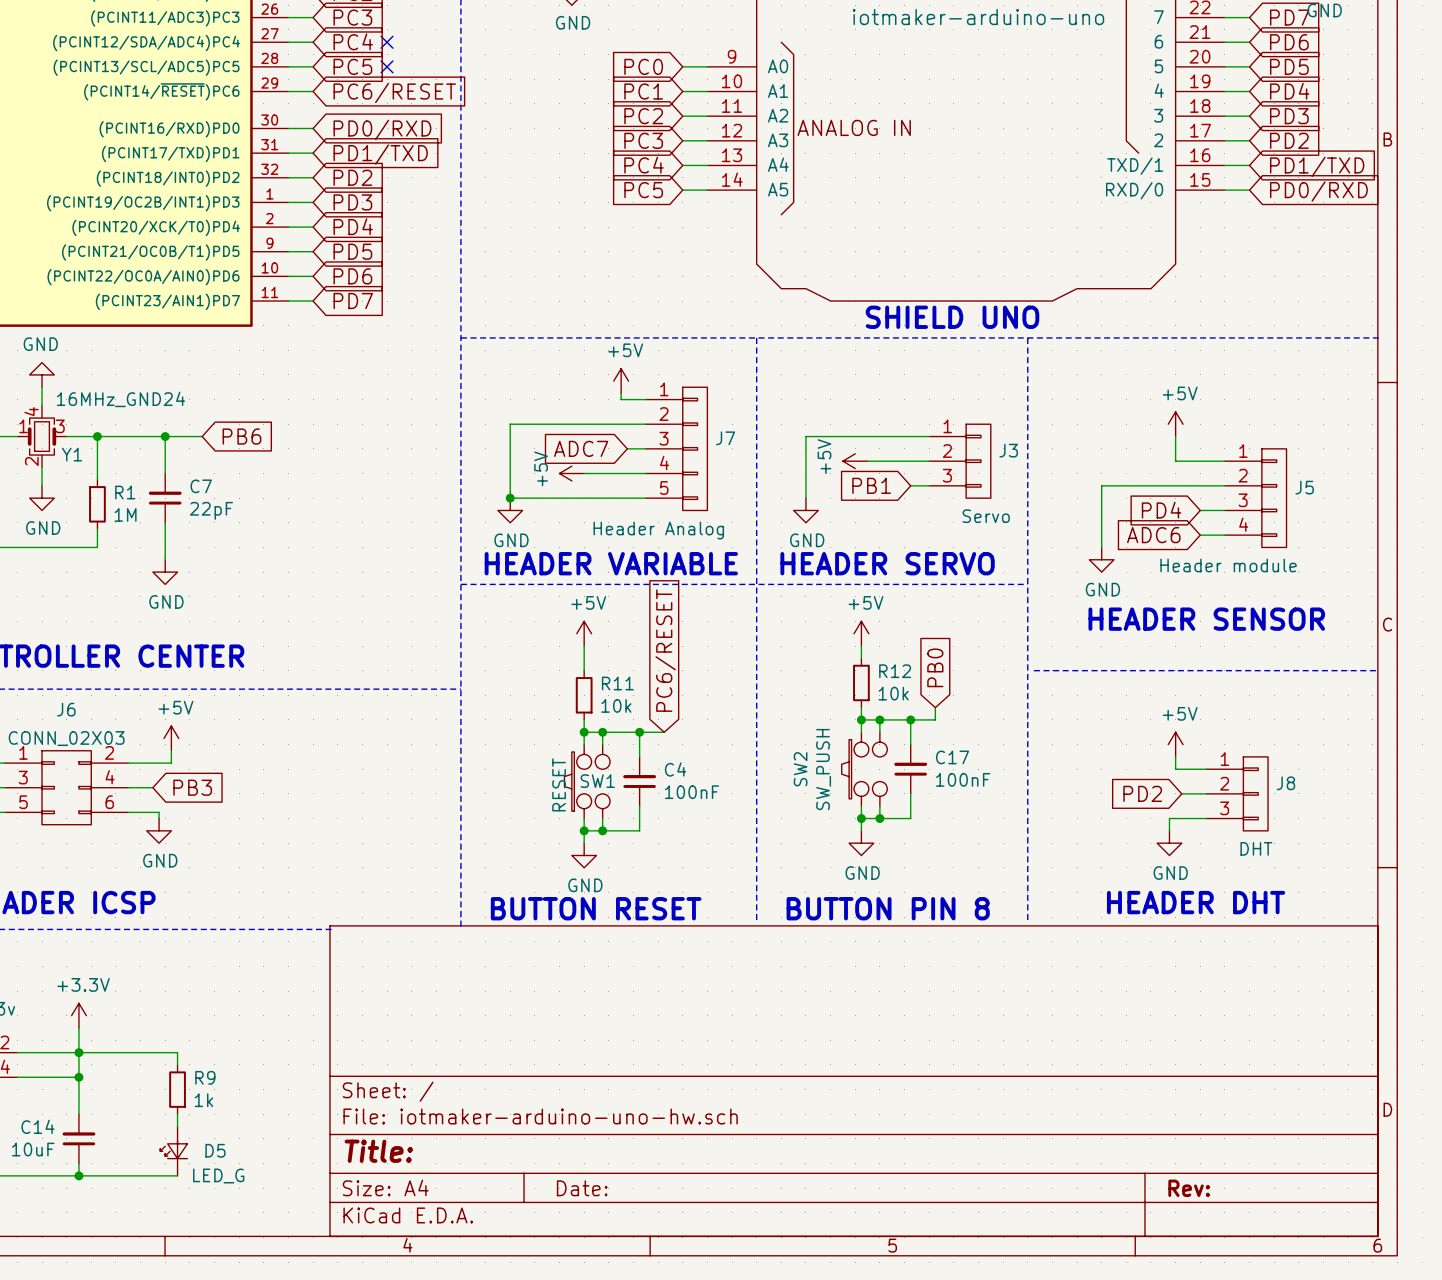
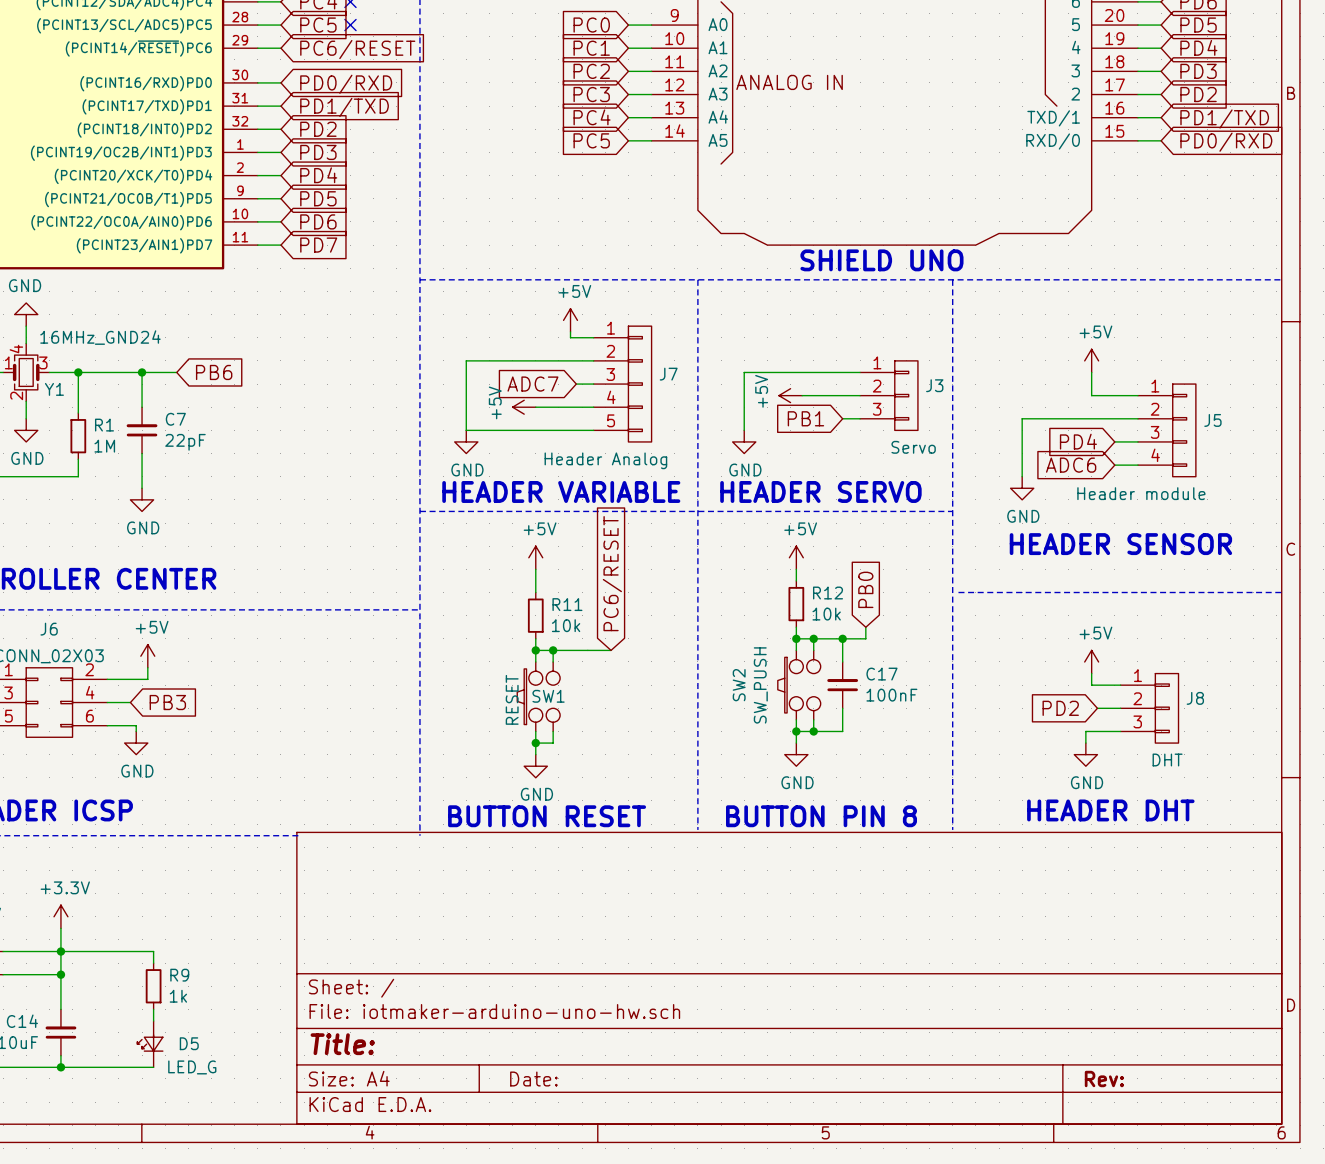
junction: (510, 498) -> none
wire: (639, 732) (639, 756) -> none
junction: (639, 732) -> none
C4: 100nF (639, 781) -> none
wire: (639, 806) (639, 830) (602, 830) -> none
junction: (602, 830) -> none

